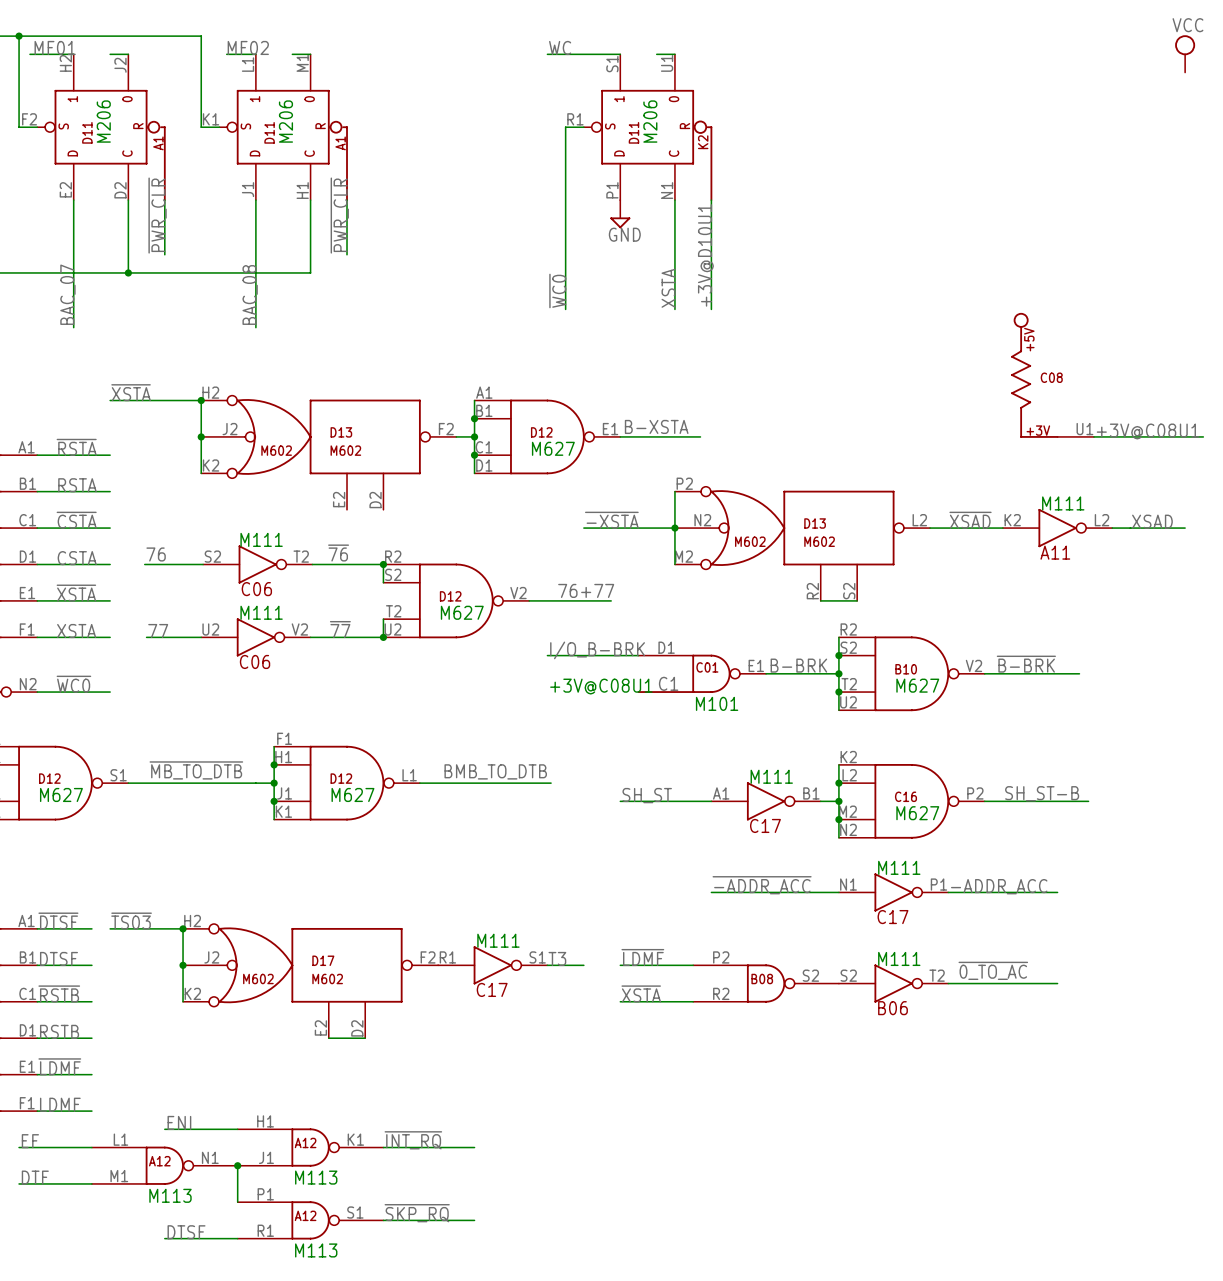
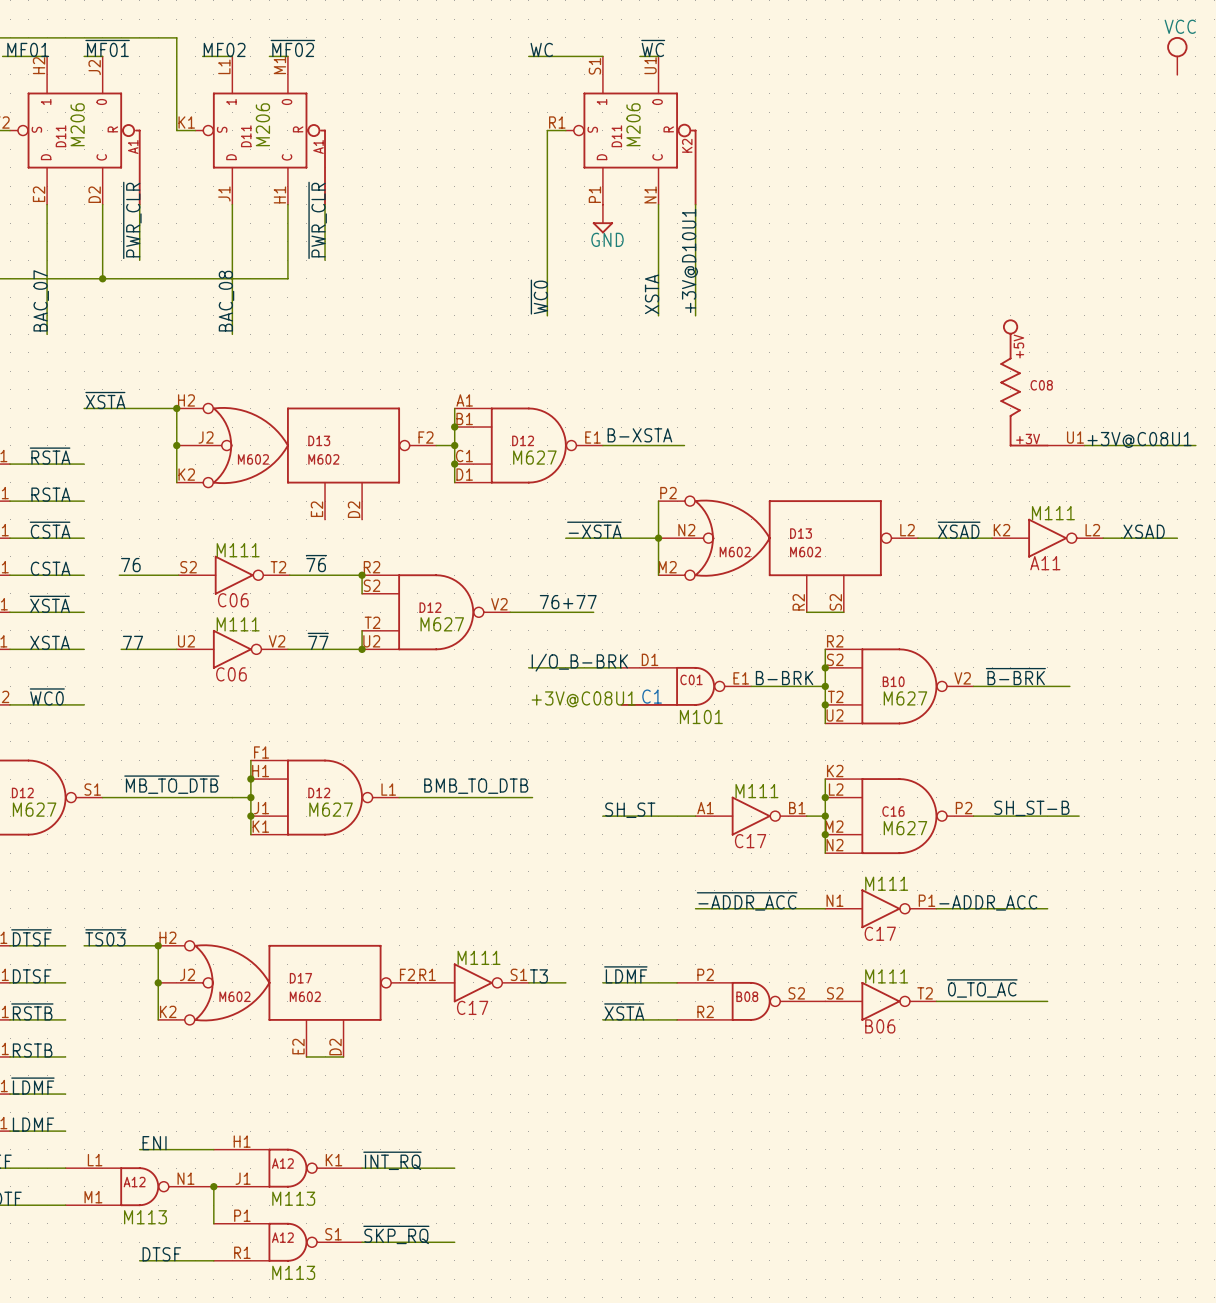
label: none -> ~{MF01} (107, 48)
label: none -> ~{MF02} (292, 48)
label: none -> ~{WC} (653, 48)

